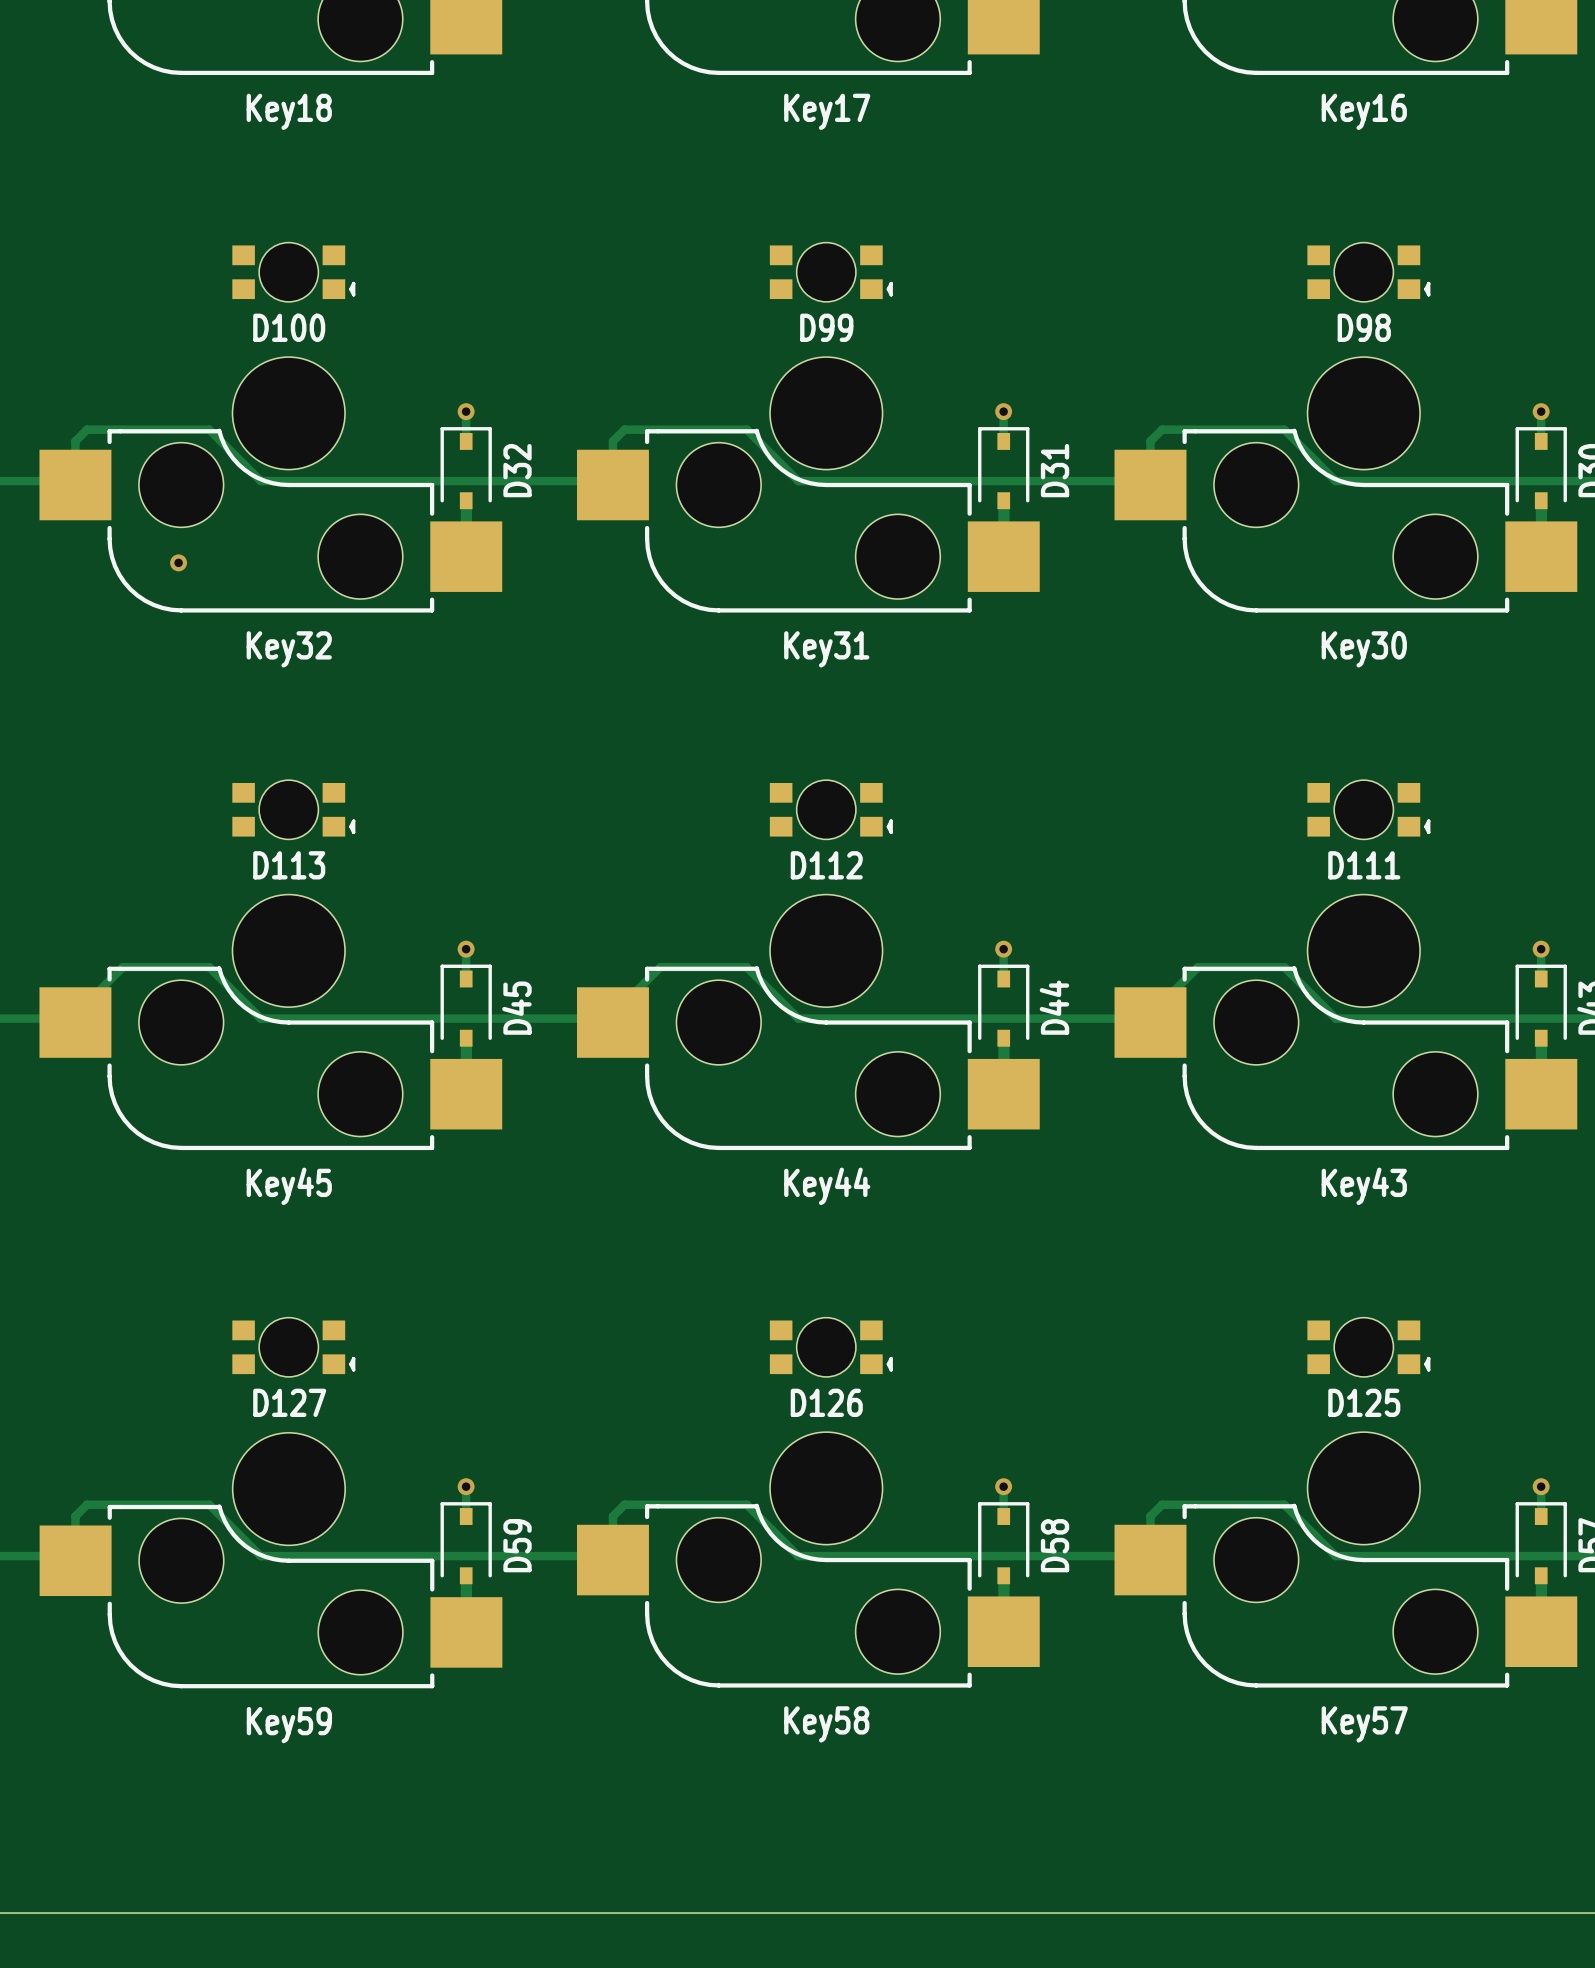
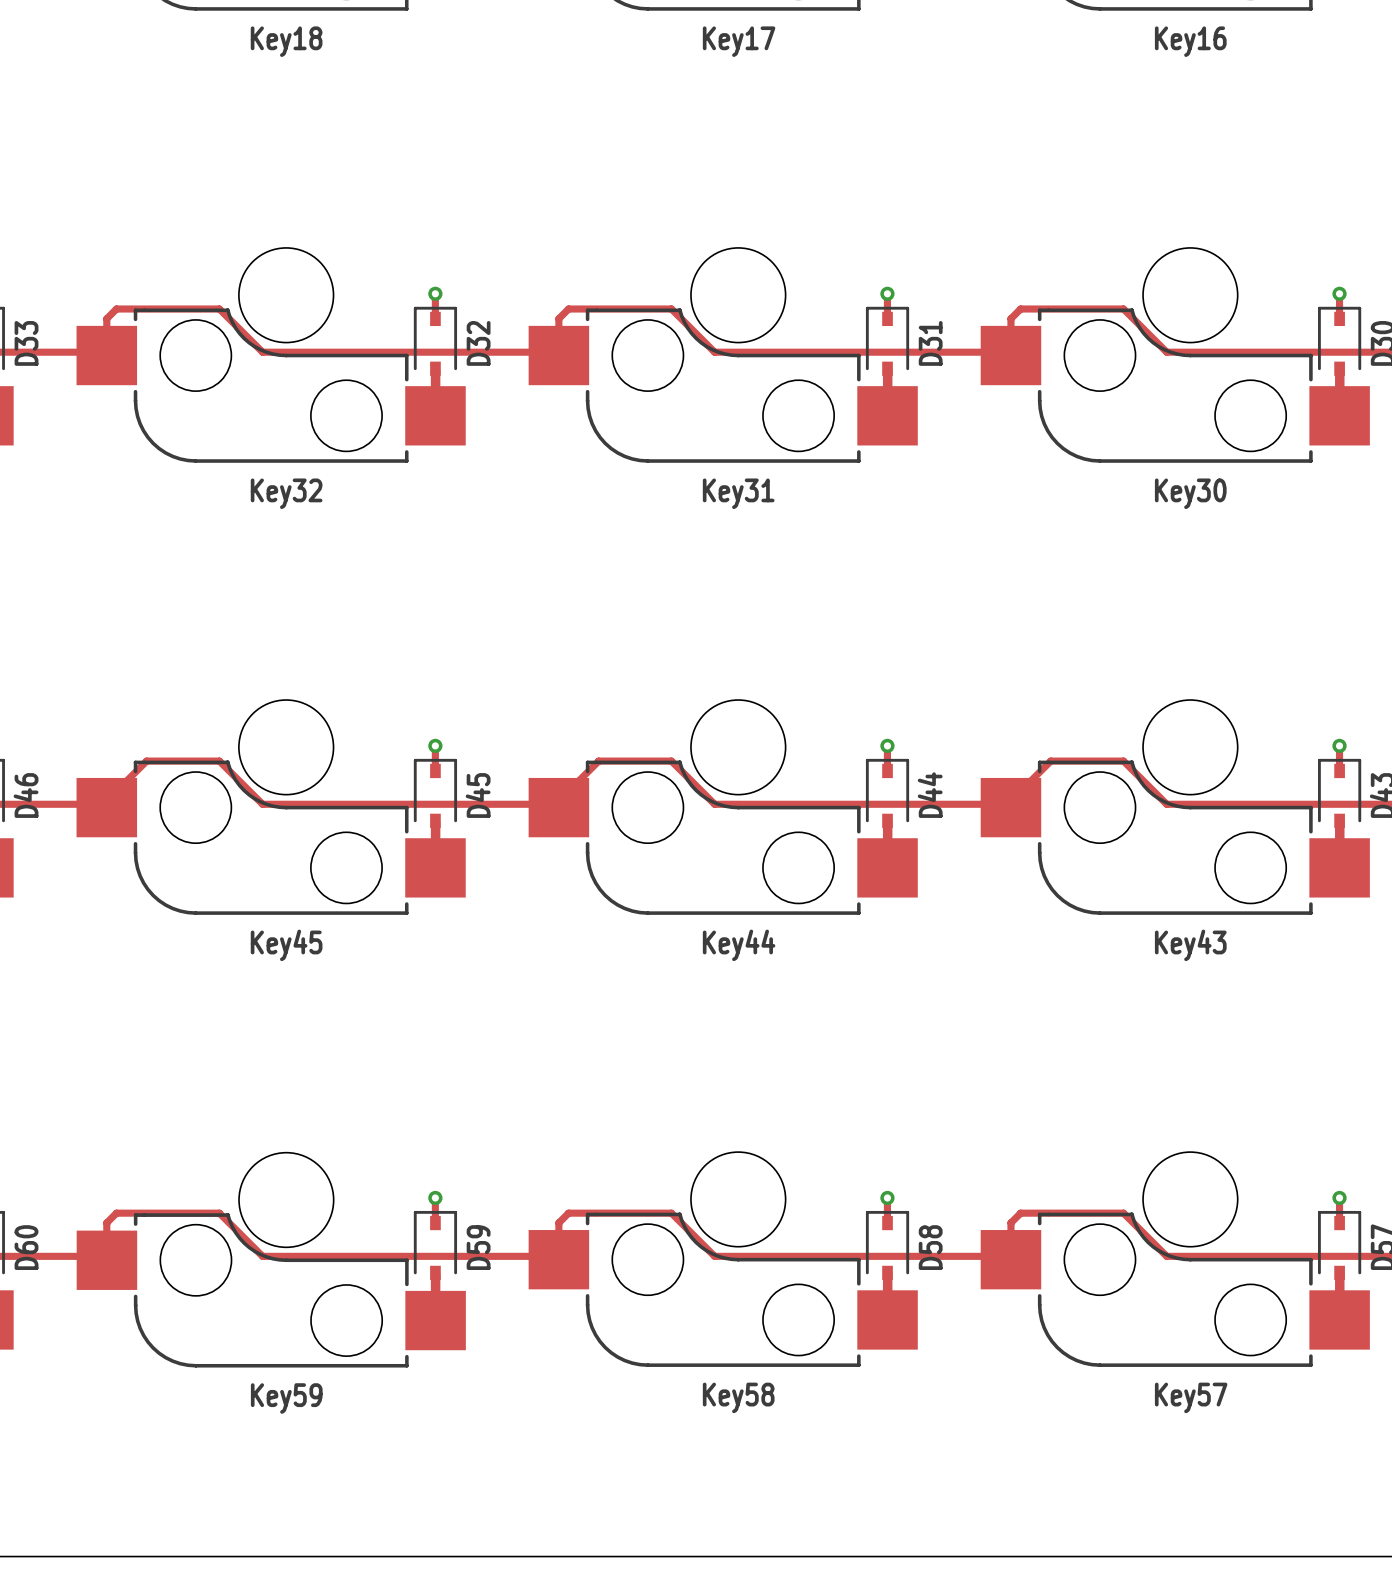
D100: (293, 272) -> none
D99: (831, 272) -> none
D98: (1368, 272) -> none
via: (178, 562) -> none
D113: (293, 809) -> none
D112: (831, 809) -> none
D111: (1368, 809) -> none
D127: (293, 1347) -> none
D126: (831, 1347) -> none
D125: (1368, 1347) -> none

